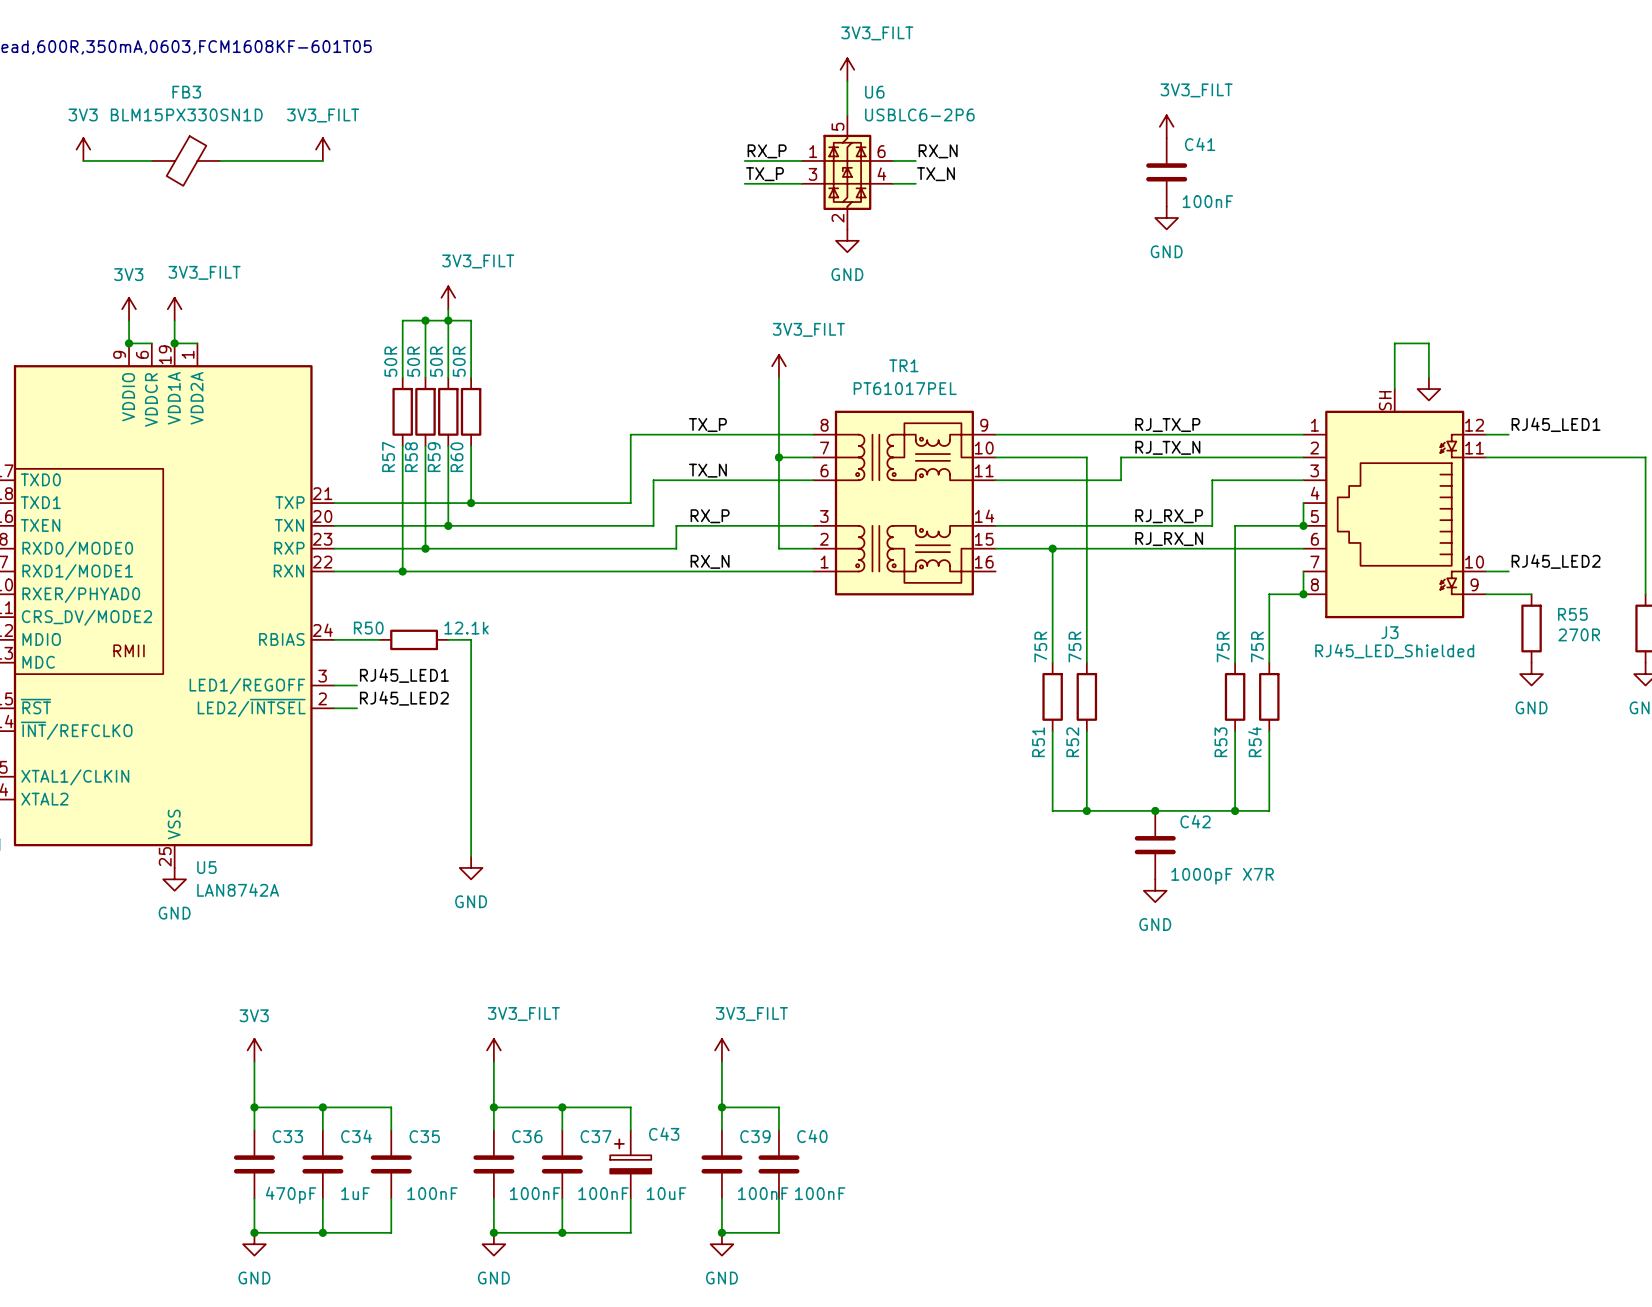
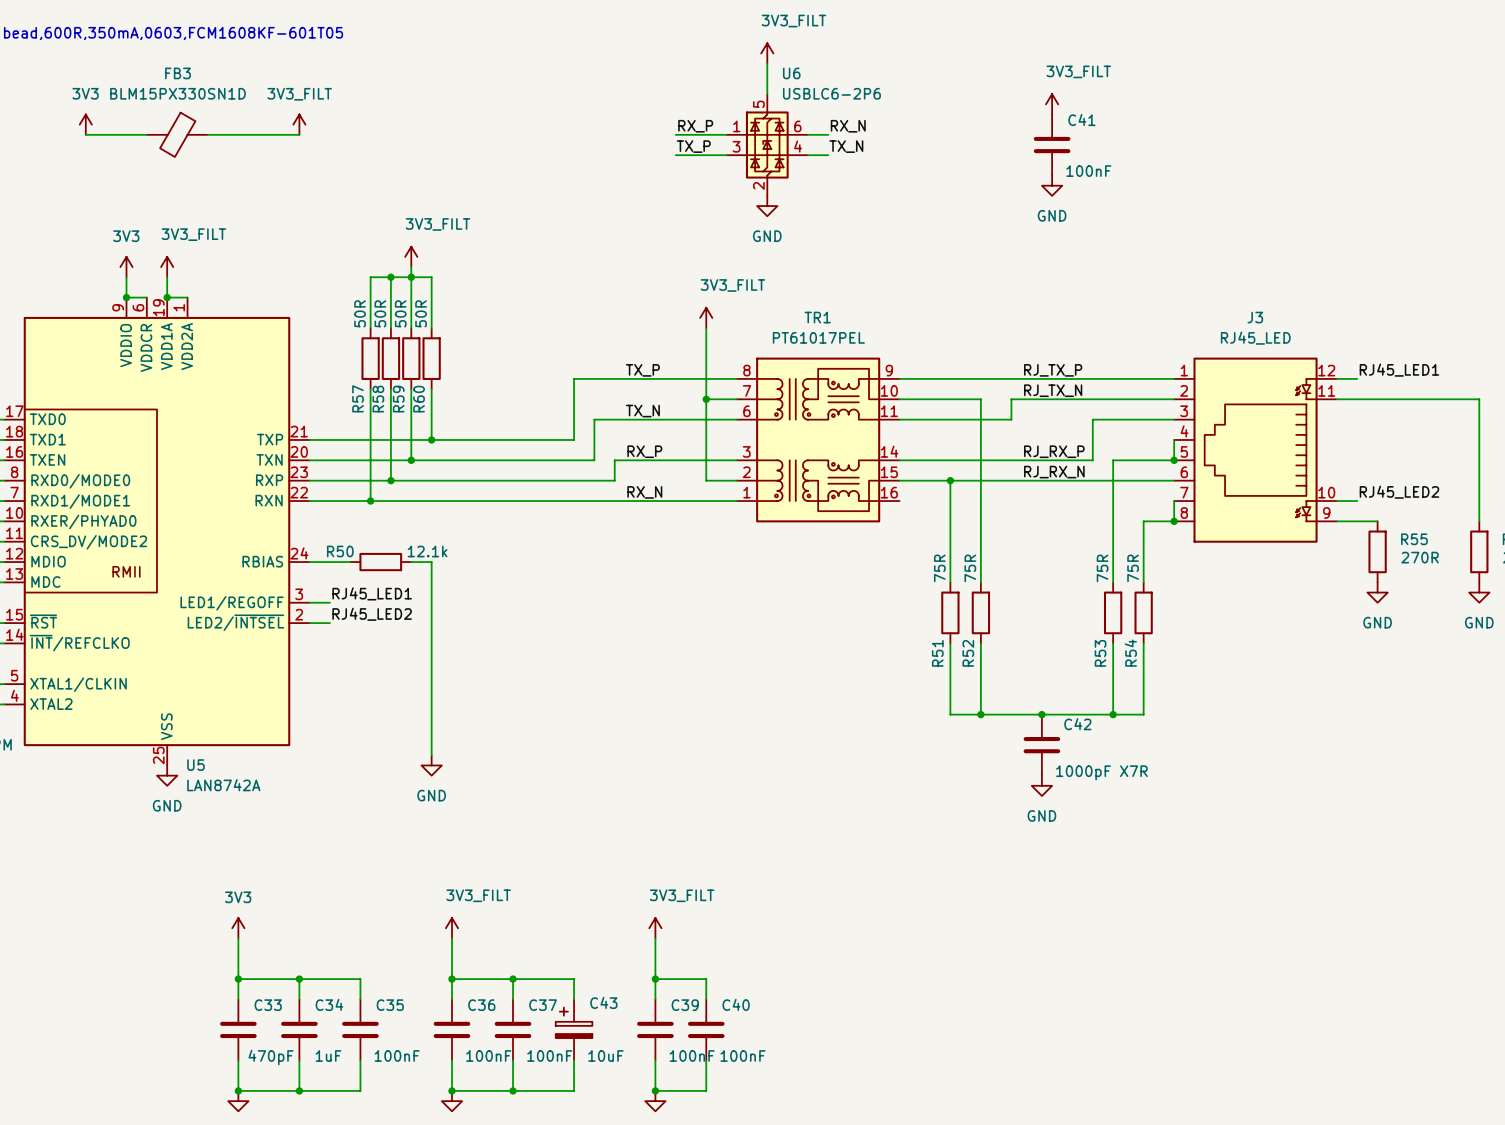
wire: (1428, 377) (1428, 343) (1394, 343) (1394, 389) -> none
J3 symbol: [1303, 389, 1486, 619] -> [1174, 357, 1337, 543]
power symbol: (1428, 389) -> none
J3 name position: J3 (1389, 632) -> J3 (1255, 317)
J3 value: RJ45_LED_Shielded (1394, 651) -> RJ45_LED (1255, 338)

